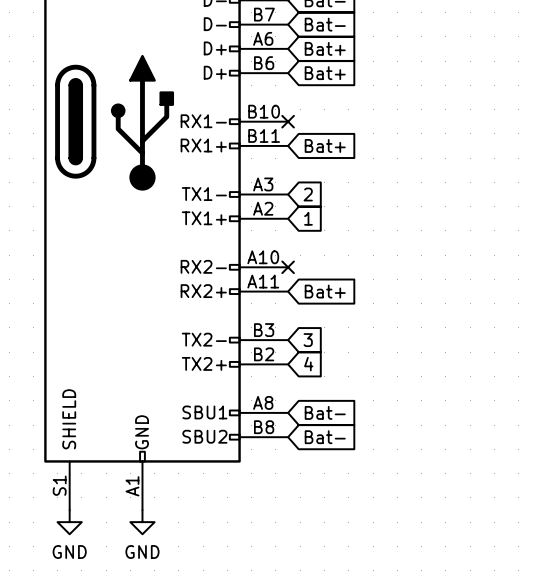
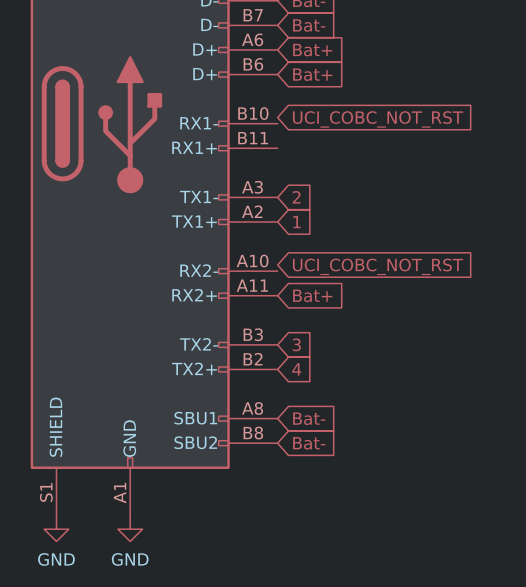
global label: none -> UCI_COBC_NOT_RST (378, 119)
no-connect mark: (288, 121) -> none
global label: Bat+ (325, 145) -> none
global label: none -> UCI_COBC_NOT_RST (378, 266)
no-connect mark: (288, 267) -> none

